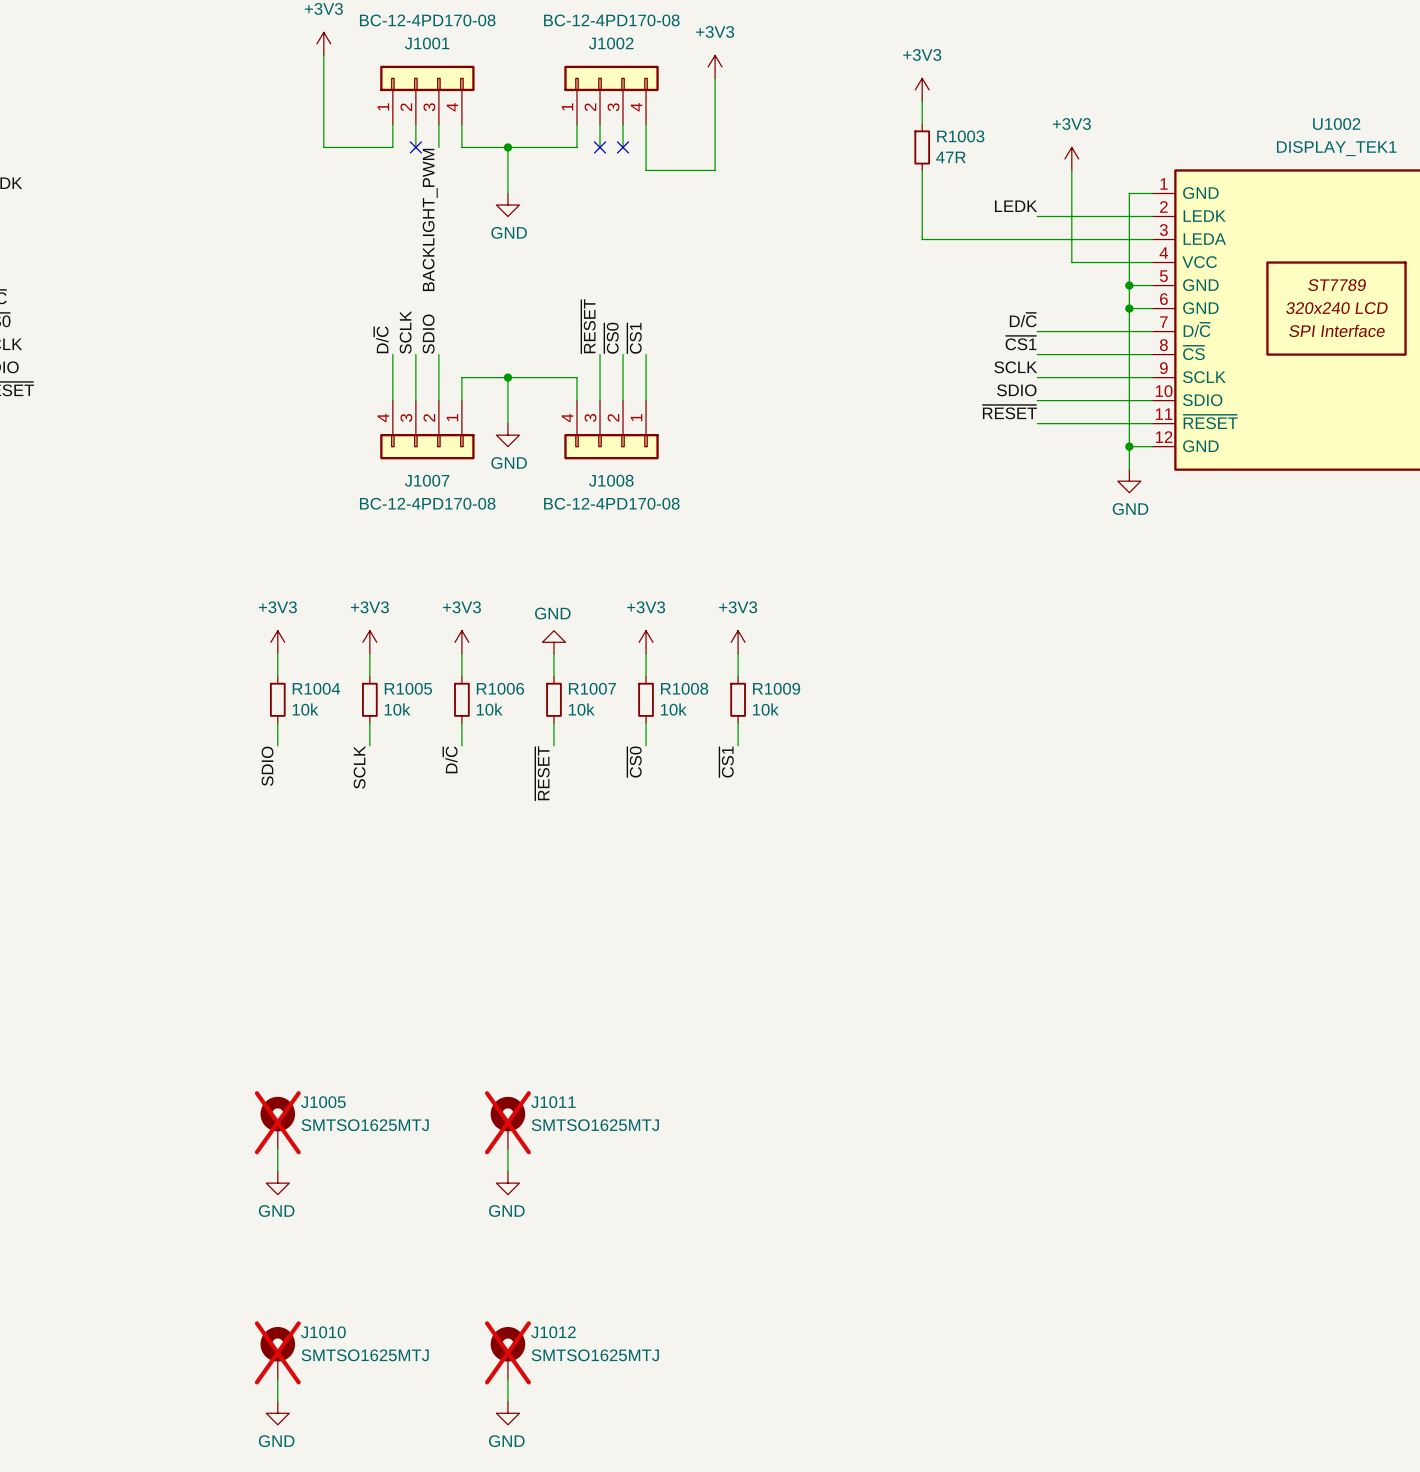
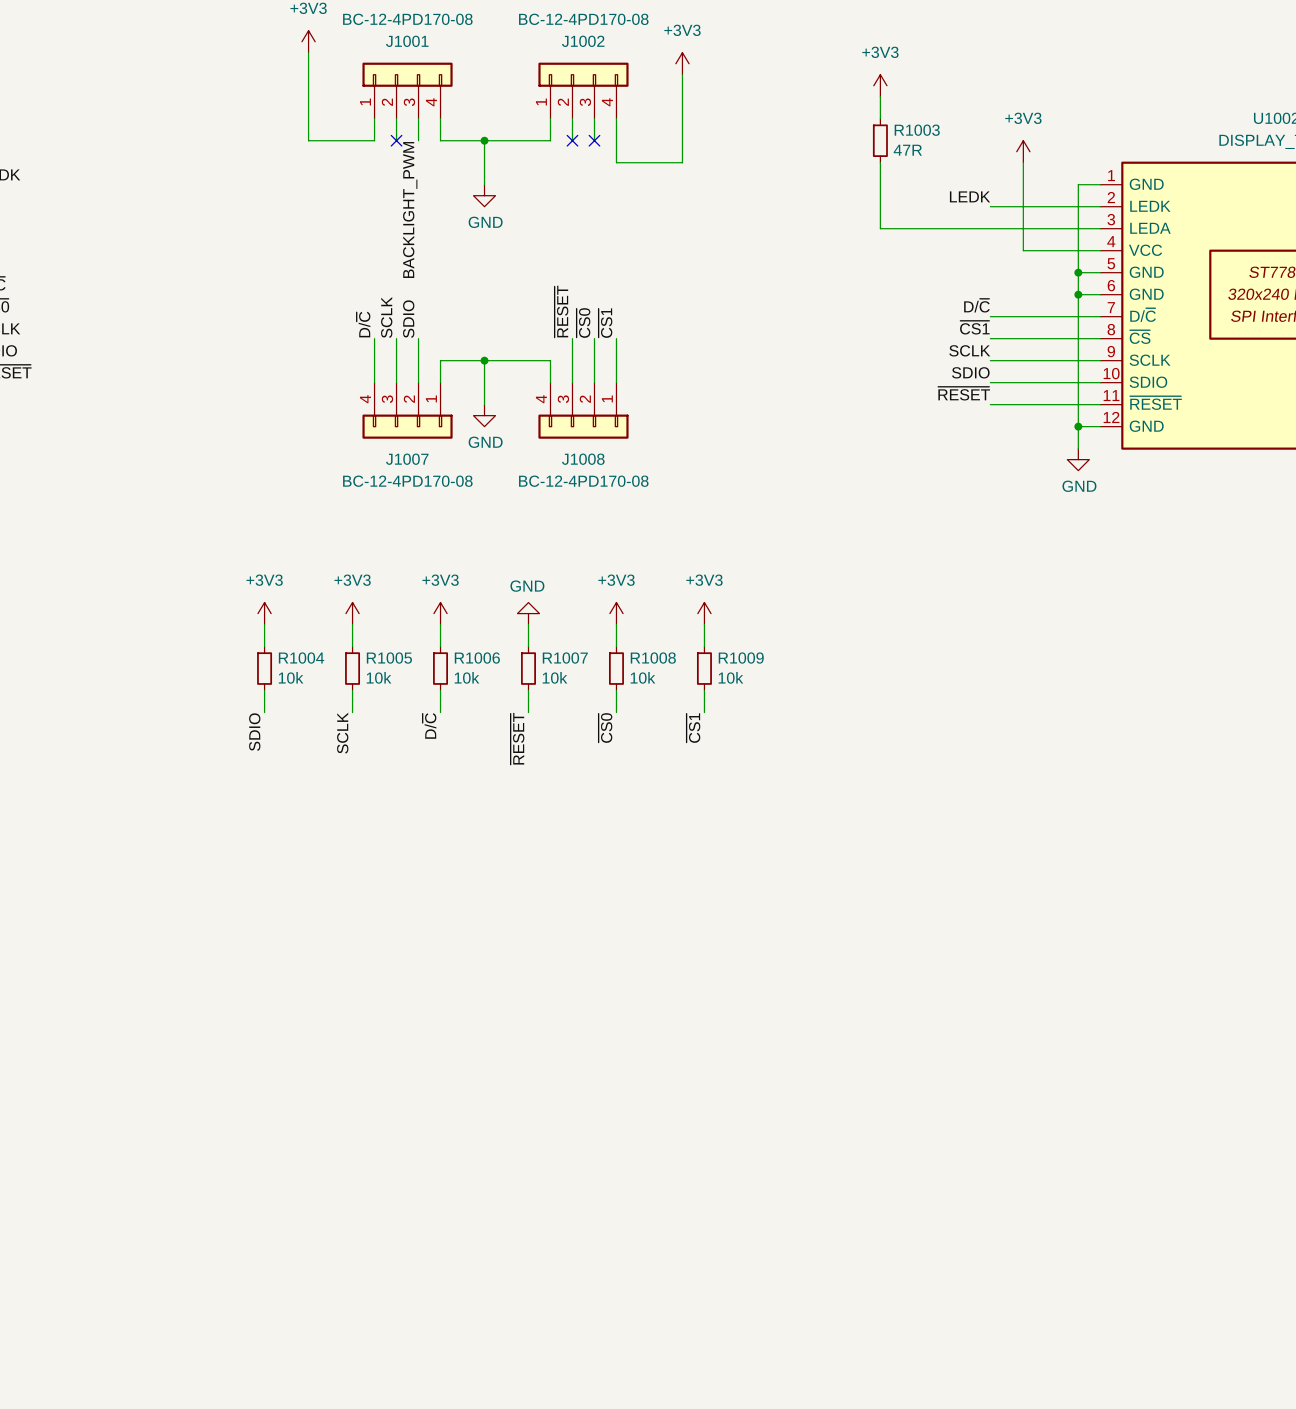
J1005: SMTSO1625MTJ (277, 1122) -> none
J1011: SMTSO1625MTJ (507, 1122) -> none
wire: (277, 1148) (277, 1171) -> none
wire: (507, 1148) (507, 1171) -> none
power symbol: GND (277, 1183) -> none
power symbol: GND (507, 1183) -> none
J1010: SMTSO1625MTJ (277, 1352) -> none
J1012: SMTSO1625MTJ (507, 1352) -> none
wire: (277, 1378) (277, 1401) -> none
wire: (507, 1378) (507, 1401) -> none
power symbol: GND (277, 1413) -> none
power symbol: GND (507, 1413) -> none

